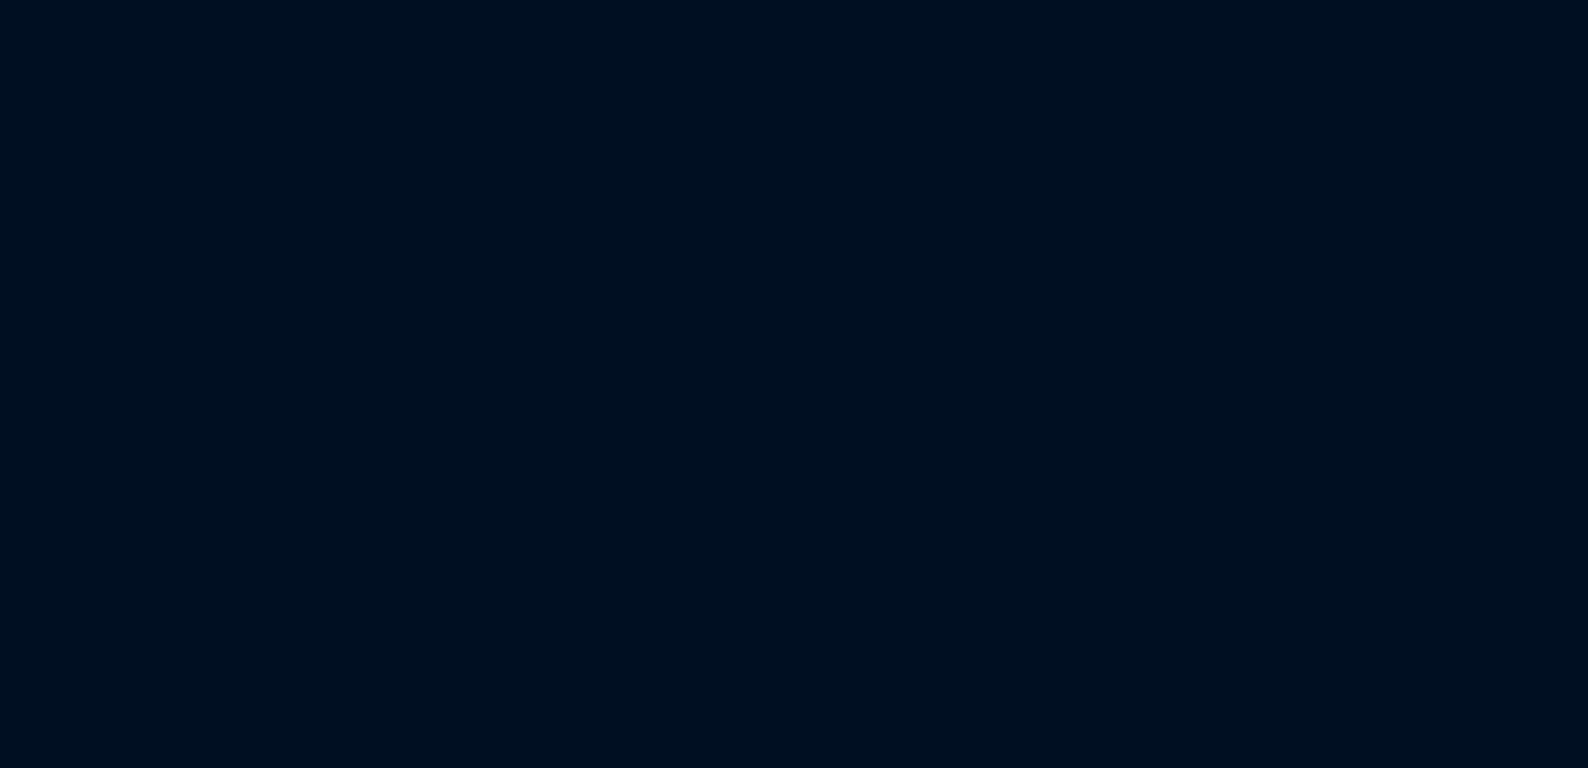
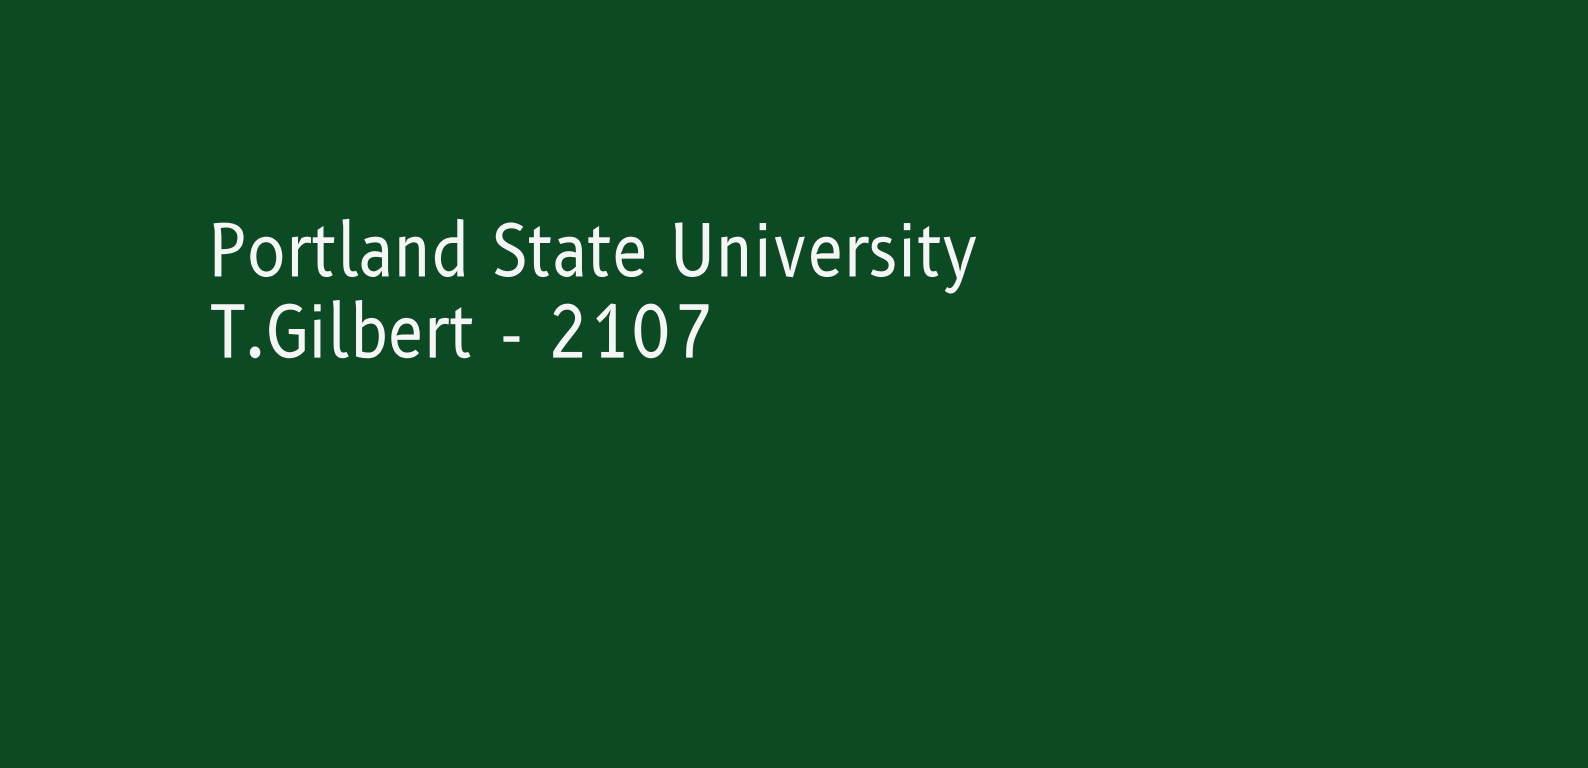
text: none -> Portland State University (594, 256)
text: none -> T.Gilbert - 2107 (459, 329)

